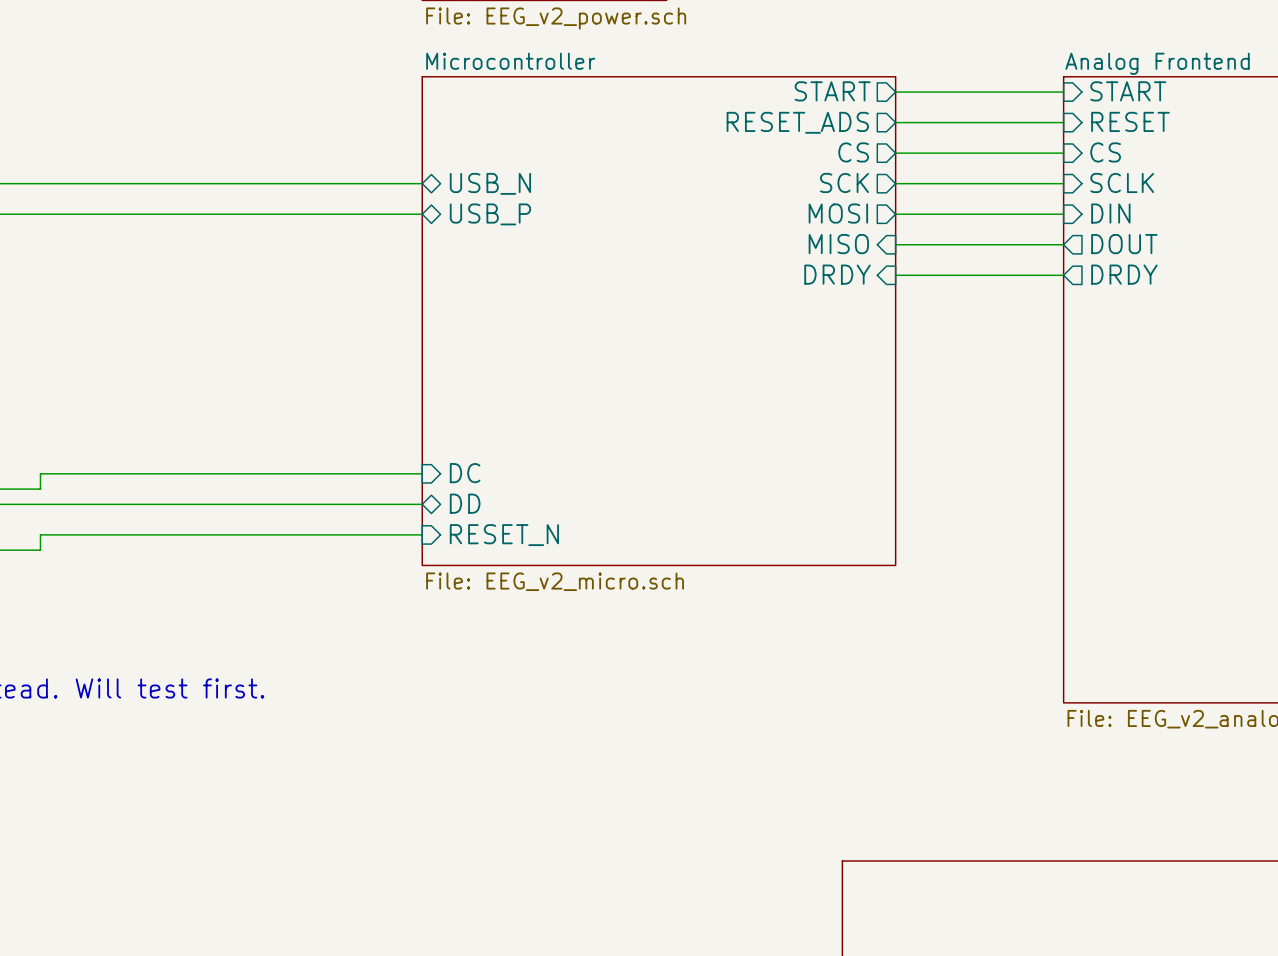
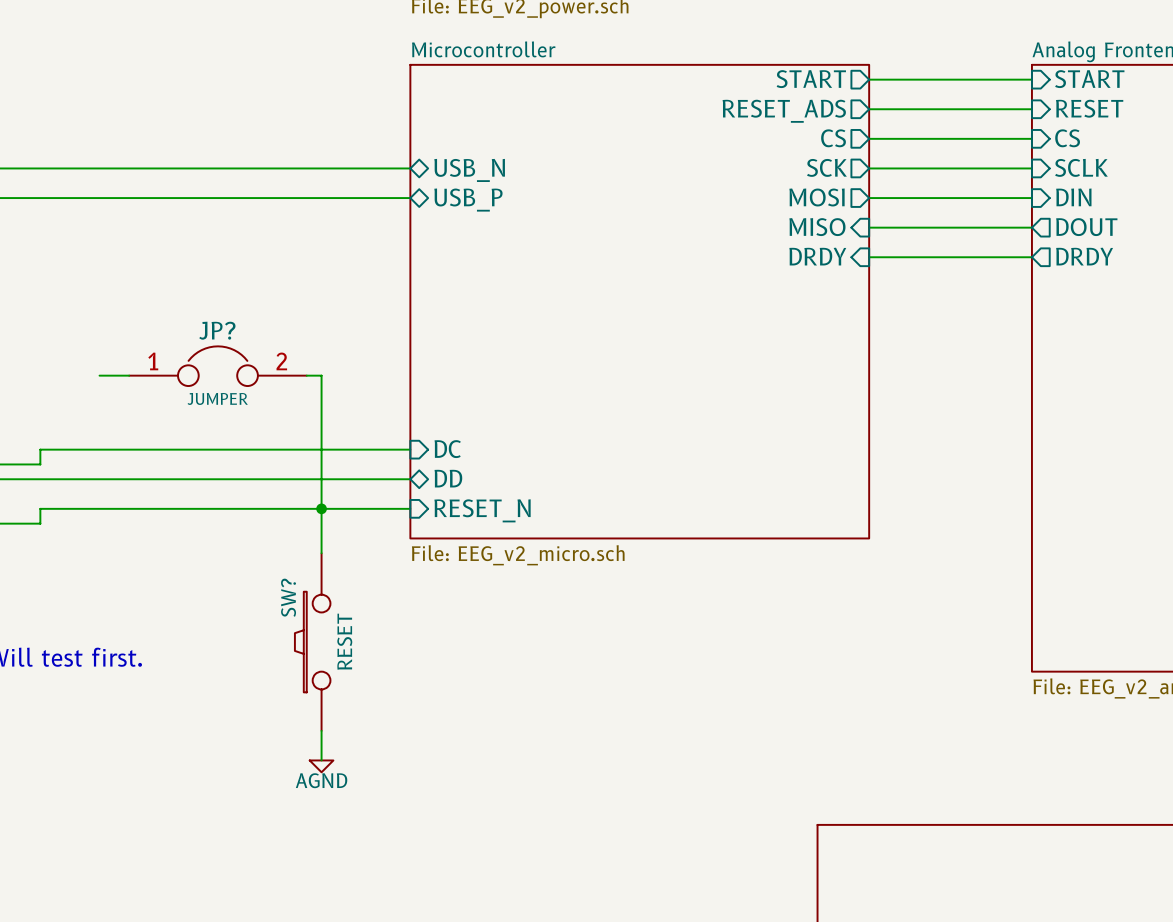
JP?: none -> JUMPER (217, 366)
wire: none -> (99, 375) (129, 375)
wire: none -> (306, 375) (321, 375) (321, 553)
junction: none -> (321, 508)
SW?: none -> RESET (312, 642)
wire: none -> (321, 730) (321, 760)
power symbol: none -> AGND (321, 766)

